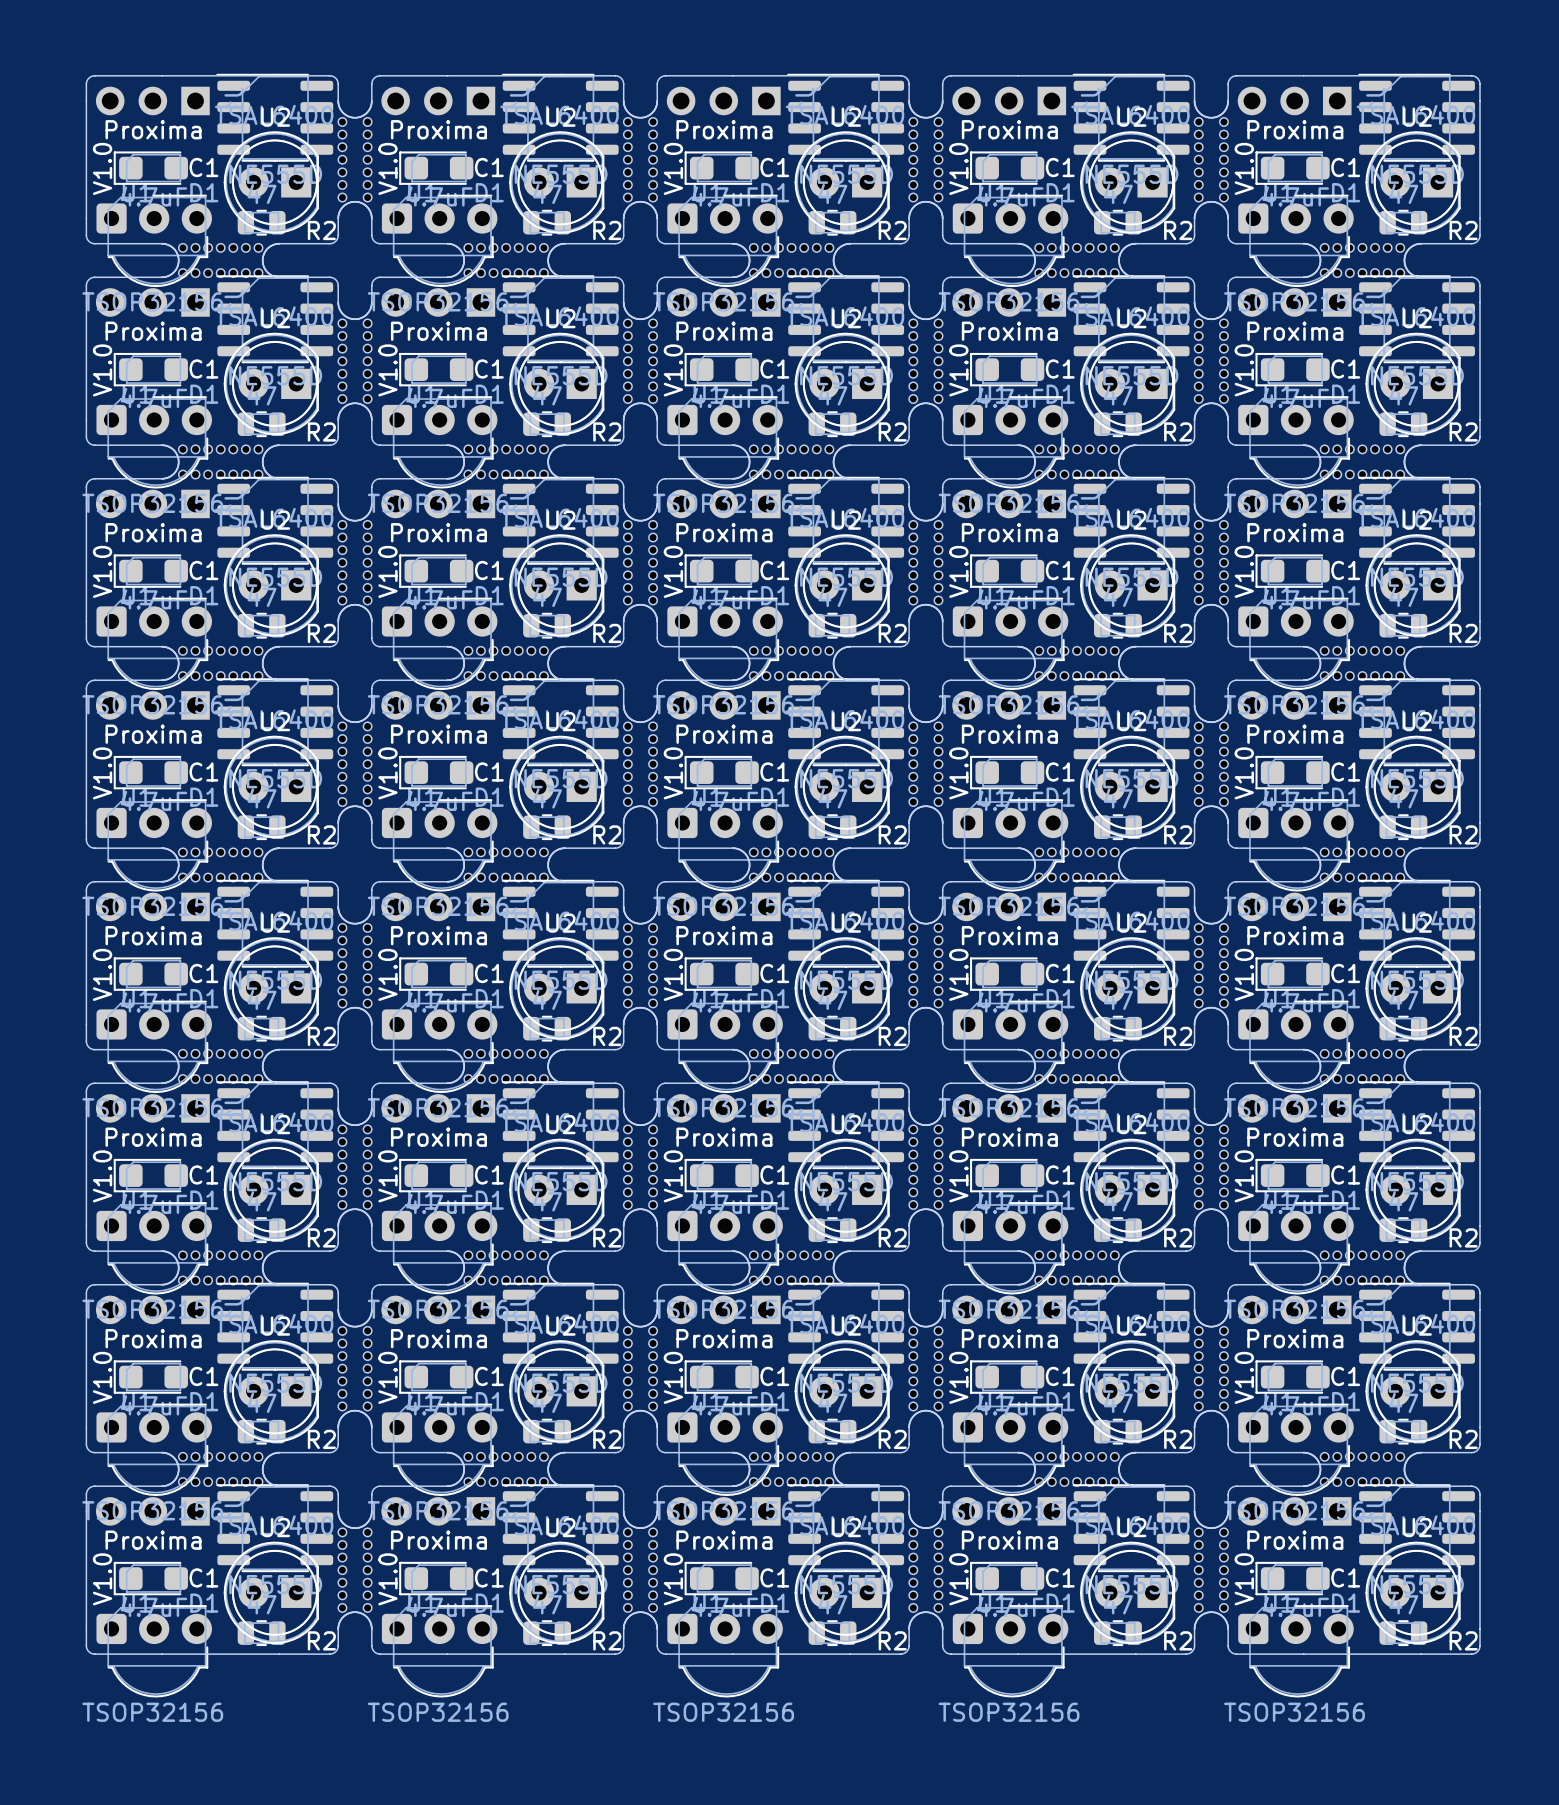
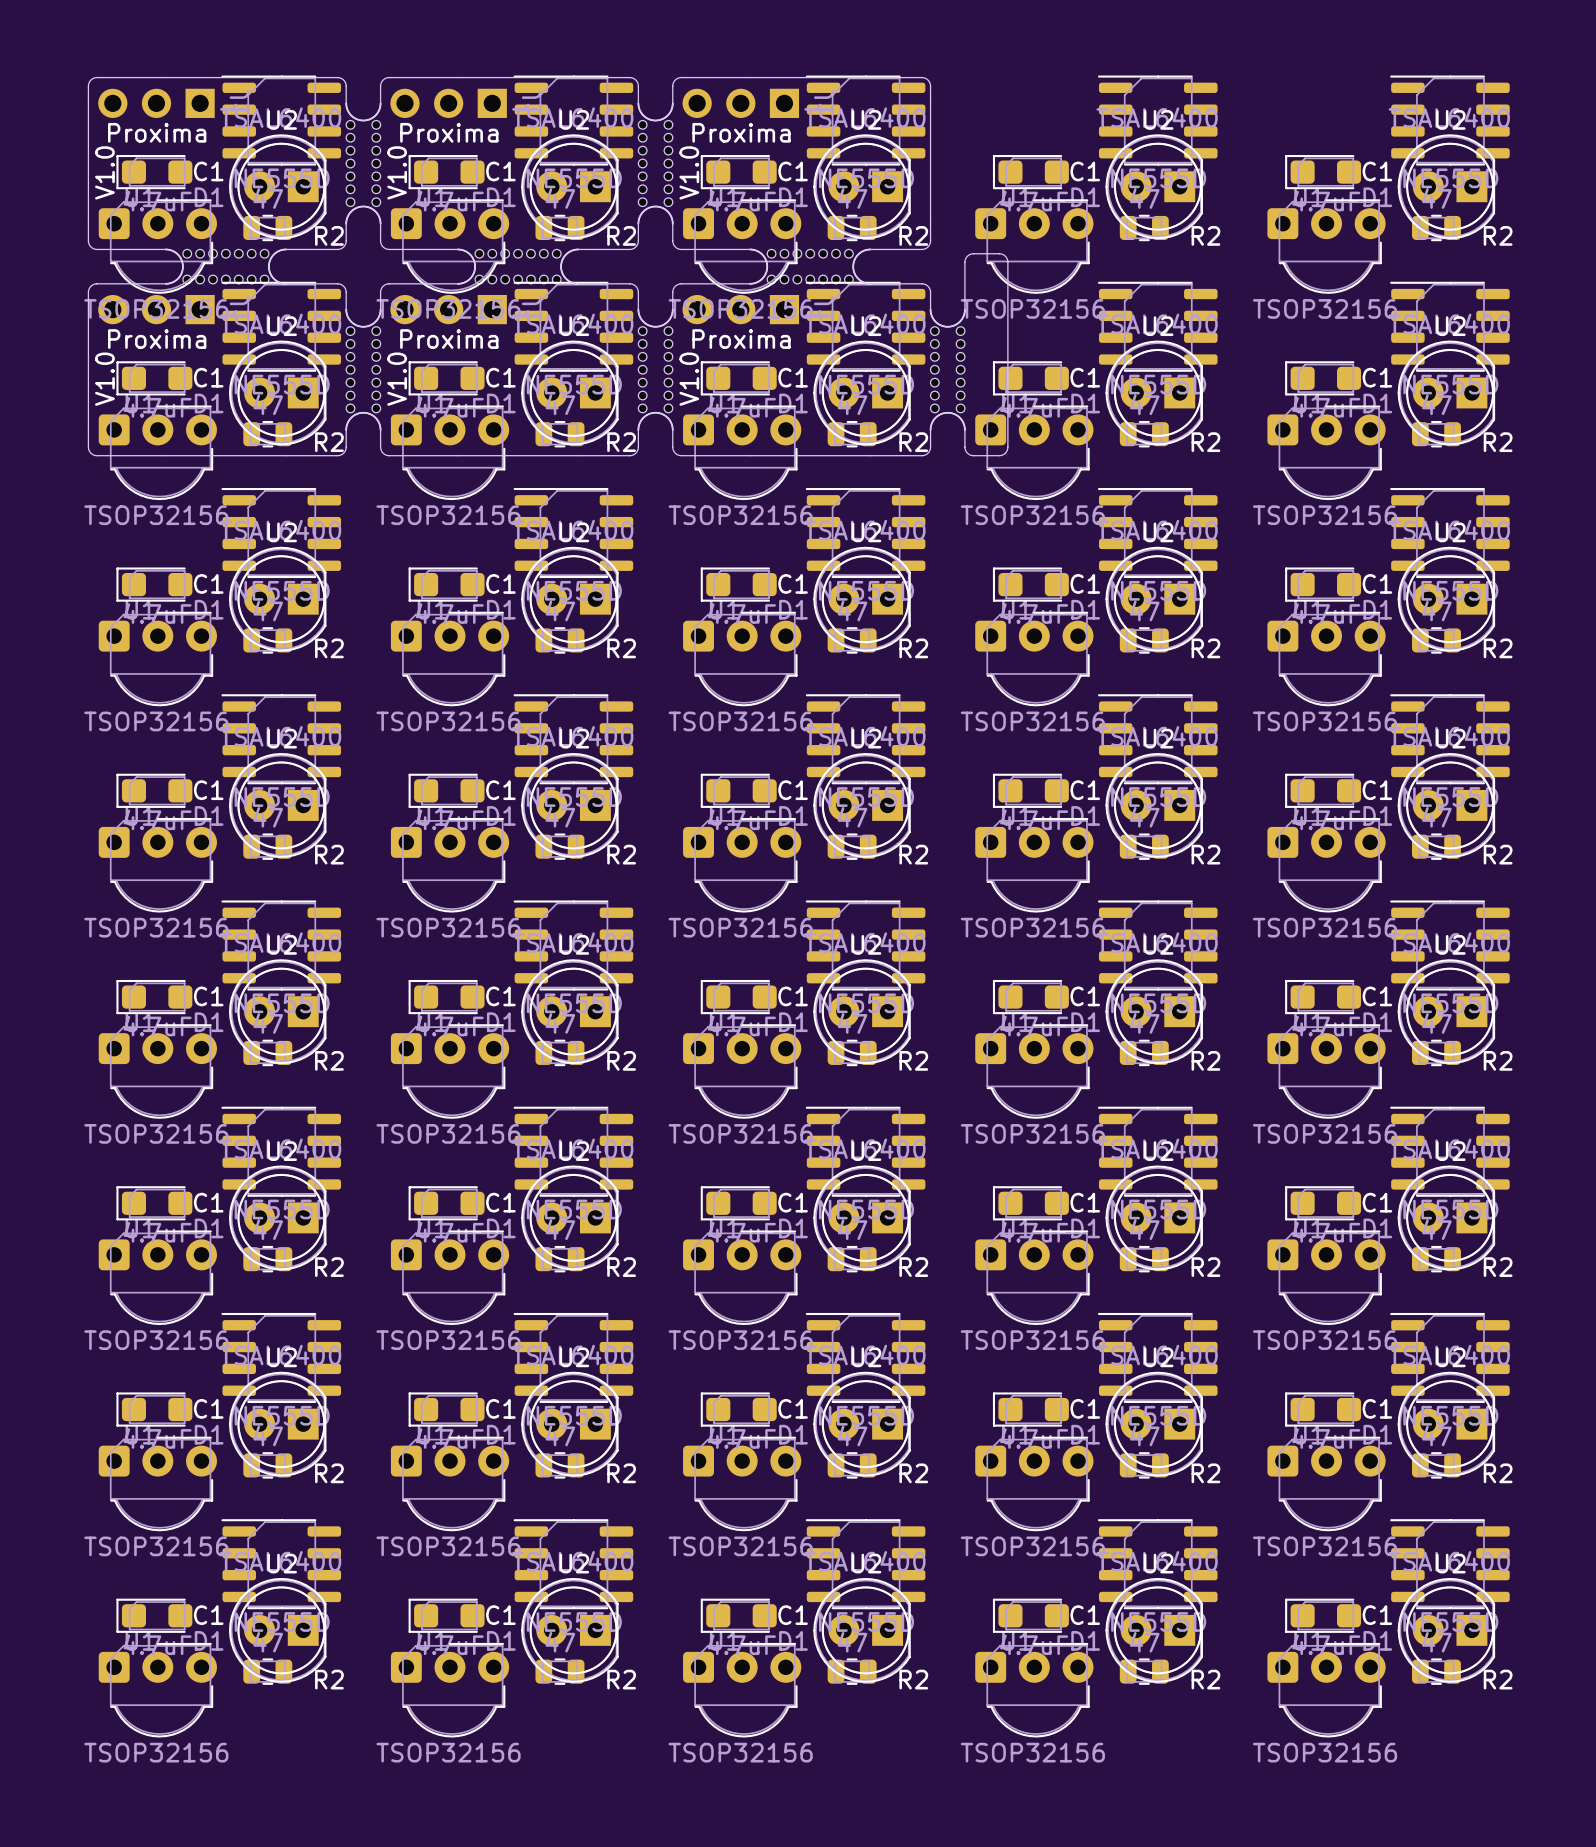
board edge: (909, 100) (911, 109) (917, 115) (925, 117) (934, 115) (942, 105) (943, 80) (950, 75) (1186, 75) (1191, 77) (1194, 82) (1194, 103) (1196, 109) (1202, 115) (1211, 117) (1219, 115) (1225, 109) (1227, 103) (1228, 82) (1235, 75) (1471, 75) (1479, 80) (1479, 238) (1472, 243) (1416, 244) (1407, 250) (1404, 260) (1407, 270) (1416, 276) (1472, 277) (1477, 279) (1480, 285) (1479, 440) (1472, 445) (1416, 445) (1407, 451) (1404, 461) (1407, 472) (1416, 478) (1472, 478) (1477, 481) (1480, 487) (1479, 641) (1472, 646) (1416, 647) (1407, 653) (1404, 663) (1407, 673) (1416, 679) (1472, 680) (1477, 682) (1479, 687) (1479, 842) (1472, 848) (1416, 848) (1407, 854) (1404, 864) (1407, 875) (1416, 881) (1472, 881) (1477, 884) (1479, 889) (1479, 1044) (1472, 1049) (1416, 1050) (1407, 1056) (1404, 1066) (1407, 1076) (1416, 1082) (1472, 1083) (1477, 1085) (1479, 1090) (1479, 1245) (1472, 1251) (1416, 1251) (1407, 1257) (1404, 1267) (1407, 1278) (1416, 1284) (1472, 1284) (1477, 1287) (1479, 1292) (1479, 1447) (1472, 1452) (1416, 1453) (1407, 1459) (1404, 1469) (1407, 1479) (1416, 1485) (1472, 1486) (1479, 1491) (1480, 1645) (1474, 1653) (1235, 1654) (1228, 1647) (1227, 1626) (1225, 1620) (1219, 1614) (1211, 1612) (1202, 1614) (1196, 1620) (1194, 1626) (1194, 1647) (1191, 1652) (1186, 1654) (950, 1654) (942, 1647) (942, 1626) (940, 1620) (934, 1614) (925, 1612) (917, 1614) (911, 1620) (909, 1626) (908, 1647) (905, 1652) (900, 1654) (664, 1654) (657, 1647) (657, 1626) (655, 1620) (648, 1614) (640, 1612) (632, 1614) (625, 1620) (623, 1626) (623, 1647) (616, 1654) (379, 1654) (372, 1647) (371, 1626) (369, 1620) (363, 1614) (355, 1612) (346, 1614) (340, 1620) (338, 1626) (337, 1647) (330, 1654) (94, 1654) (88, 1651) (86, 1645) (87, 1490) (94, 1486) (166, 1485) (175, 1479) (178, 1469) (175, 1459) (166, 1453) (93, 1452) (88, 1450) (86, 1444) (87, 1288) (94, 1284) (166, 1284) (175, 1278) (178, 1270) (175, 1257) (166, 1251) (93, 1251) (88, 1248) (86, 1242) (87, 1087) (94, 1083) (166, 1082) (175, 1076) (178, 1068) (175, 1056) (166, 1050) (93, 1049) (88, 1047) (86, 1041) (87, 885) (94, 881) (166, 881) (175, 875) (178, 864) (175, 854) (166, 848) (93, 848) (86, 841) (87, 684) (94, 680) (166, 679) (175, 673) (178, 663) (175, 653) (166, 647) (94, 646) (87, 642) (86, 486) (88, 481) (93, 478) (161, 478) (170, 476) (177, 468) (178, 457) (172, 448) (161, 445) -> none
part: (1009, 100) -> none
part: (1294, 100) -> none
text: Proxima (1009, 129) -> none
text: Proxima (1295, 129) -> none
part: (925, 159) -> none
part: (1211, 159) -> none
text: V1.0 (958, 168) -> none
text: V1.0 (1244, 168) -> none
board edge: (909, 218) (911, 210) (915, 205) (923, 201) (930, 202) (937, 206) (941, 212) (942, 236) (946, 242) (1020, 243) (1030, 248) (1034, 256) (1032, 268) (1022, 276) (950, 277) (945, 279) (942, 285) -> (930, 223) (930, 103)
board edge: (1194, 218) (1194, 237) (1189, 243) (1135, 243) (1125, 247) (1119, 258) (1122, 270) (1133, 277) (1190, 278) (1194, 284) (1194, 304) (1196, 310) (1202, 317) (1211, 319) (1219, 317) (1225, 310) (1227, 304) (1228, 283) (1233, 277) (1305, 277) (1313, 273) (1319, 266) (1320, 258) (1318, 252) (1308, 244) (1232, 242) (1228, 236) (1226, 212) (1217, 203) (1209, 201) (1201, 205) (1196, 210) (1194, 218) -> none
part: (1077, 260) -> none
part: (1362, 260) -> none
part: (1009, 302) -> none
part: (1294, 302) -> none
text: Proxima (1009, 331) -> none
text: Proxima (1295, 331) -> none
part: (1211, 361) -> none
text: V1.0 (958, 370) -> none
text: V1.0 (1244, 370) -> none
board edge: (1194, 420) (1194, 438) (1189, 444) (1135, 445) (1125, 448) (1119, 459) (1122, 472) (1133, 478) (1190, 479) (1194, 486) (1194, 506) (1196, 512) (1202, 518) (1211, 520) (1219, 518) (1225, 512) (1227, 506) (1228, 484) (1233, 479) (1305, 478) (1313, 475) (1319, 468) (1320, 459) (1318, 453) (1308, 445) (1232, 444) (1228, 437) (1226, 413) (1217, 404) (1209, 403) (1201, 406) (1196, 411) (1194, 420) -> none
board edge: (279, 445) (269, 448) (263, 455) (262, 464) (267, 473) (277, 478) (334, 479) (338, 486) (338, 506) (340, 512) (346, 518) (355, 520) (363, 518) (369, 512) (371, 506) (372, 484) (377, 479) (447, 478) (457, 475) (463, 466) (463, 457) (457, 448) (447, 445) -> (286, 455) (165, 455)
board edge: (564, 445) (554, 448) (549, 455) (548, 464) (553, 473) (562, 478) (619, 479) (623, 486) (623, 506) (625, 512) (632, 518) (640, 520) (648, 518) (655, 512) (657, 506) (657, 484) (662, 479) (732, 478) (743, 475) (749, 466) (749, 457) (743, 448) (732, 445) -> (578, 455) (457, 455)
board edge: none -> (750, 455) (870, 455)
board edge: (850, 445) (840, 448) (834, 455) (833, 464) (838, 473) (848, 478) (904, 479) (909, 486) (909, 506) (911, 512) (917, 518) (925, 520) (934, 518) (940, 512) (942, 506) (942, 484) (947, 479) (1020, 478) (1028, 475) (1033, 468) (1033, 455) (1024, 446) (976, 445) -> (964, 292) (964, 261) (968, 255) (999, 253) (1006, 257) (1007, 262) (1007, 447) (1005, 453) (999, 455)
part: (220, 461) -> none
part: (506, 461) -> none
part: (791, 461) -> none
part: (1077, 461) -> none
part: (1362, 461) -> none
part: (152, 503) -> none
part: (438, 503) -> none
part: (723, 503) -> none
part: (1009, 503) -> none
part: (1294, 503) -> none
text: Proxima (153, 532) -> none
text: Proxima (438, 532) -> none
text: Proxima (724, 532) -> none
text: Proxima (1009, 532) -> none
text: Proxima (1295, 532) -> none
part: (355, 562) -> none
part: (640, 562) -> none
part: (925, 562) -> none
part: (1211, 562) -> none
text: V1.0 (102, 571) -> none
text: V1.0 (387, 571) -> none
text: V1.0 (673, 571) -> none
text: V1.0 (958, 571) -> none
text: V1.0 (1244, 571) -> none
board edge: (338, 621) (337, 640) (333, 646) (279, 646) (269, 650) (262, 661) (266, 673) (277, 680) (334, 681) (338, 687) (338, 707) (340, 713) (346, 719) (355, 722) (363, 719) (369, 713) (371, 707) (372, 686) (377, 680) (449, 680) (457, 676) (462, 669) (464, 661) (461, 655) (451, 647) (376, 645) (371, 639) (370, 615) (361, 605) (352, 604) (344, 608) (340, 613) (338, 621) -> none
board edge: (623, 621) (623, 640) (618, 646) (564, 646) (554, 650) (548, 661) (551, 673) (562, 680) (619, 681) (623, 687) (623, 707) (625, 713) (632, 719) (640, 722) (648, 719) (655, 713) (657, 707) (657, 686) (662, 680) (735, 680) (743, 676) (748, 669) (749, 661) (747, 655) (737, 647) (661, 645) (657, 639) (655, 615) (646, 605) (638, 604) (630, 608) (625, 613) (623, 621) -> none
board edge: (909, 621) (908, 640) (903, 646) (850, 646) (840, 650) (833, 661) (837, 673) (848, 680) (904, 681) (909, 687) (909, 707) (911, 713) (917, 719) (925, 722) (934, 719) (940, 713) (942, 707) (942, 686) (947, 680) (1020, 680) (1028, 676) (1033, 669) (1034, 661) (1032, 655) (1022, 647) (946, 645) (942, 639) (941, 615) (932, 605) (923, 604) (915, 608) (911, 613) (909, 621) -> none
board edge: (1194, 621) (1194, 640) (1189, 646) (1135, 646) (1125, 650) (1119, 661) (1122, 673) (1133, 680) (1190, 681) (1194, 687) (1194, 707) (1196, 713) (1202, 719) (1211, 722) (1219, 719) (1225, 713) (1227, 707) (1228, 686) (1233, 680) (1305, 680) (1313, 676) (1319, 669) (1320, 661) (1318, 655) (1308, 647) (1232, 645) (1228, 639) (1226, 615) (1217, 605) (1209, 604) (1201, 608) (1196, 613) (1194, 621) -> none
part: (220, 663) -> none
part: (506, 663) -> none
part: (791, 663) -> none
part: (1077, 663) -> none
part: (1362, 663) -> none
part: (152, 705) -> none
part: (438, 705) -> none
part: (723, 705) -> none
part: (1009, 705) -> none
part: (1294, 705) -> none
text: Proxima (153, 734) -> none
text: Proxima (438, 734) -> none
text: Proxima (724, 734) -> none
text: Proxima (1009, 734) -> none
text: Proxima (1295, 734) -> none
part: (355, 764) -> none
part: (640, 764) -> none
part: (925, 764) -> none
part: (1211, 764) -> none
text: V1.0 (102, 773) -> none
text: V1.0 (387, 773) -> none
text: V1.0 (673, 773) -> none
text: V1.0 (958, 773) -> none
text: V1.0 (1244, 773) -> none
board edge: (338, 822) (337, 841) (333, 847) (279, 848) (269, 851) (262, 862) (266, 875) (277, 881) (334, 882) (338, 889) (338, 909) (340, 915) (346, 921) (355, 923) (363, 921) (369, 915) (371, 909) (372, 887) (377, 882) (449, 881) (457, 878) (462, 871) (464, 862) (461, 856) (451, 848) (376, 847) (371, 840) (370, 816) (361, 807) (352, 806) (344, 809) (340, 814) (338, 822) -> none
board edge: (623, 822) (623, 841) (618, 847) (564, 848) (554, 851) (548, 862) (551, 875) (562, 881) (619, 882) (623, 889) (623, 909) (625, 915) (632, 921) (640, 923) (648, 921) (655, 915) (657, 909) (657, 887) (662, 882) (735, 881) (743, 878) (748, 871) (749, 862) (747, 856) (737, 848) (661, 847) (657, 840) (655, 816) (646, 807) (638, 806) (630, 809) (625, 814) (623, 822) -> none
board edge: (909, 822) (908, 841) (903, 847) (850, 848) (840, 851) (833, 862) (837, 875) (848, 881) (904, 882) (909, 889) (909, 909) (911, 915) (917, 921) (925, 923) (934, 921) (940, 915) (942, 909) (942, 887) (947, 882) (1020, 881) (1028, 878) (1033, 871) (1034, 862) (1032, 856) (1022, 848) (946, 847) (942, 840) (941, 816) (932, 807) (923, 806) (915, 809) (911, 814) (909, 822) -> none
board edge: (1194, 822) (1194, 841) (1189, 847) (1135, 848) (1125, 851) (1119, 862) (1122, 875) (1133, 881) (1190, 882) (1194, 889) (1194, 909) (1196, 915) (1202, 921) (1211, 923) (1219, 921) (1225, 915) (1227, 909) (1228, 887) (1233, 882) (1305, 881) (1313, 878) (1319, 871) (1320, 862) (1318, 856) (1308, 848) (1232, 847) (1228, 840) (1226, 816) (1217, 807) (1209, 806) (1201, 809) (1196, 814) (1194, 822) -> none
part: (220, 864) -> none
part: (506, 864) -> none
part: (791, 864) -> none
part: (1077, 864) -> none
part: (1362, 864) -> none
part: (152, 906) -> none
part: (438, 906) -> none
part: (723, 906) -> none
part: (1009, 906) -> none
part: (1294, 906) -> none
text: Proxima (153, 935) -> none
text: Proxima (438, 935) -> none
text: Proxima (724, 935) -> none
text: Proxima (1009, 935) -> none
text: Proxima (1295, 935) -> none
part: (355, 965) -> none
part: (640, 965) -> none
part: (925, 965) -> none
part: (1211, 965) -> none
text: V1.0 (102, 974) -> none
text: V1.0 (387, 974) -> none
text: V1.0 (673, 974) -> none
text: V1.0 (958, 974) -> none
text: V1.0 (1244, 974) -> none
board edge: (338, 1024) (337, 1043) (333, 1049) (279, 1049) (269, 1053) (262, 1064) (266, 1076) (277, 1083) (334, 1084) (338, 1090) (338, 1110) (340, 1116) (346, 1122) (355, 1125) (363, 1122) (369, 1116) (371, 1110) (372, 1089) (377, 1083) (449, 1083) (457, 1079) (462, 1072) (464, 1064) (461, 1058) (451, 1050) (376, 1048) (371, 1042) (370, 1018) (361, 1008) (352, 1007) (344, 1011) (340, 1016) (338, 1024) -> none
board edge: (623, 1024) (623, 1043) (618, 1049) (564, 1049) (554, 1053) (548, 1064) (551, 1076) (562, 1083) (619, 1084) (623, 1090) (623, 1110) (625, 1116) (632, 1122) (640, 1125) (648, 1122) (655, 1116) (657, 1110) (657, 1089) (662, 1083) (735, 1083) (743, 1079) (748, 1072) (749, 1064) (747, 1058) (737, 1050) (661, 1048) (657, 1042) (655, 1018) (646, 1008) (638, 1007) (630, 1011) (625, 1016) (623, 1024) -> none
board edge: (909, 1024) (908, 1043) (903, 1049) (850, 1049) (840, 1053) (833, 1064) (837, 1076) (848, 1083) (904, 1084) (909, 1090) (909, 1110) (911, 1116) (917, 1122) (925, 1125) (934, 1122) (940, 1116) (942, 1110) (942, 1089) (947, 1083) (1020, 1083) (1028, 1079) (1033, 1072) (1034, 1064) (1032, 1058) (1022, 1050) (946, 1048) (942, 1042) (941, 1018) (932, 1008) (923, 1007) (915, 1011) (911, 1016) (909, 1024) -> none
board edge: (1194, 1024) (1194, 1043) (1189, 1049) (1135, 1049) (1125, 1053) (1119, 1064) (1122, 1076) (1133, 1083) (1190, 1084) (1194, 1090) (1194, 1110) (1196, 1116) (1202, 1122) (1211, 1125) (1219, 1122) (1225, 1116) (1227, 1110) (1228, 1089) (1233, 1083) (1305, 1083) (1313, 1079) (1319, 1072) (1320, 1064) (1318, 1058) (1308, 1050) (1232, 1048) (1228, 1042) (1226, 1018) (1217, 1008) (1209, 1007) (1201, 1011) (1196, 1016) (1194, 1024) -> none
part: (220, 1066) -> none
part: (506, 1066) -> none
part: (791, 1066) -> none
part: (1077, 1066) -> none
part: (1362, 1066) -> none
part: (152, 1108) -> none
part: (438, 1108) -> none
part: (723, 1108) -> none
part: (1009, 1108) -> none
part: (1294, 1108) -> none
text: Proxima (153, 1137) -> none
text: Proxima (438, 1137) -> none
text: Proxima (724, 1137) -> none
text: Proxima (1009, 1137) -> none
text: Proxima (1295, 1137) -> none
part: (355, 1167) -> none
part: (640, 1167) -> none
part: (925, 1167) -> none
part: (1211, 1167) -> none
text: V1.0 (102, 1176) -> none
text: V1.0 (387, 1176) -> none
text: V1.0 (673, 1176) -> none
text: V1.0 (958, 1176) -> none
text: V1.0 (1244, 1176) -> none
board edge: (338, 1225) (337, 1244) (333, 1250) (279, 1251) (269, 1254) (262, 1265) (266, 1278) (277, 1284) (334, 1285) (338, 1292) (338, 1312) (340, 1318) (346, 1324) (355, 1326) (363, 1324) (369, 1318) (371, 1312) (372, 1290) (377, 1285) (449, 1284) (457, 1281) (462, 1274) (464, 1265) (461, 1259) (451, 1251) (376, 1250) (371, 1243) (370, 1219) (361, 1210) (352, 1209) (344, 1212) (340, 1217) (338, 1225) -> none
board edge: (623, 1225) (623, 1244) (618, 1250) (564, 1251) (554, 1254) (548, 1265) (551, 1278) (562, 1284) (619, 1285) (623, 1292) (623, 1312) (625, 1318) (632, 1324) (640, 1326) (648, 1324) (655, 1318) (657, 1312) (657, 1290) (662, 1285) (735, 1284) (743, 1281) (748, 1274) (749, 1265) (747, 1259) (737, 1251) (661, 1250) (657, 1243) (655, 1219) (646, 1210) (638, 1209) (630, 1212) (625, 1217) (623, 1225) -> none
board edge: (909, 1225) (908, 1244) (903, 1250) (850, 1251) (840, 1254) (833, 1265) (837, 1278) (848, 1284) (904, 1285) (909, 1292) (909, 1312) (911, 1318) (917, 1324) (925, 1326) (934, 1324) (940, 1318) (942, 1312) (942, 1290) (947, 1285) (1020, 1284) (1028, 1281) (1033, 1274) (1034, 1265) (1032, 1259) (1022, 1251) (946, 1250) (942, 1243) (941, 1219) (932, 1210) (923, 1209) (915, 1212) (911, 1217) (909, 1225) -> none
board edge: (1194, 1225) (1194, 1244) (1189, 1250) (1135, 1251) (1125, 1254) (1119, 1265) (1122, 1278) (1133, 1284) (1190, 1285) (1194, 1292) (1194, 1312) (1196, 1318) (1202, 1324) (1211, 1326) (1219, 1324) (1225, 1318) (1227, 1312) (1228, 1290) (1233, 1285) (1305, 1284) (1313, 1281) (1319, 1274) (1320, 1265) (1318, 1259) (1308, 1251) (1232, 1250) (1228, 1243) (1226, 1219) (1217, 1210) (1209, 1209) (1201, 1212) (1196, 1217) (1194, 1225) -> none
part: (220, 1267) -> none
part: (506, 1267) -> none
part: (791, 1267) -> none
part: (1077, 1267) -> none
part: (1362, 1267) -> none
part: (152, 1309) -> none
part: (438, 1309) -> none
part: (723, 1309) -> none
part: (1009, 1309) -> none
part: (1294, 1309) -> none
text: Proxima (153, 1338) -> none
text: Proxima (438, 1338) -> none
text: Proxima (724, 1338) -> none
text: Proxima (1009, 1338) -> none
text: Proxima (1295, 1338) -> none
part: (355, 1368) -> none
part: (640, 1368) -> none
part: (925, 1368) -> none
part: (1211, 1368) -> none
text: V1.0 (102, 1377) -> none
text: V1.0 (387, 1377) -> none
text: V1.0 (673, 1377) -> none
text: V1.0 (958, 1377) -> none
text: V1.0 (1244, 1377) -> none
board edge: (338, 1427) (337, 1446) (333, 1451) (279, 1452) (269, 1456) (262, 1467) (266, 1479) (277, 1486) (334, 1487) (338, 1493) (338, 1513) (340, 1519) (346, 1525) (355, 1528) (363, 1525) (369, 1519) (371, 1513) (372, 1492) (377, 1486) (449, 1486) (457, 1482) (462, 1475) (464, 1467) (461, 1461) (451, 1453) (376, 1451) (371, 1445) (370, 1421) (361, 1411) (352, 1410) (344, 1414) (340, 1419) (338, 1427) -> none
board edge: (623, 1427) (623, 1446) (618, 1451) (564, 1452) (554, 1456) (548, 1467) (551, 1479) (562, 1486) (619, 1487) (623, 1493) (623, 1513) (625, 1519) (632, 1525) (640, 1528) (648, 1525) (655, 1519) (657, 1513) (657, 1492) (662, 1486) (735, 1486) (743, 1482) (748, 1475) (749, 1467) (747, 1461) (737, 1453) (661, 1451) (657, 1445) (655, 1421) (646, 1411) (638, 1410) (630, 1414) (625, 1419) (623, 1427) -> none
board edge: (909, 1427) (908, 1446) (903, 1451) (850, 1452) (840, 1456) (833, 1467) (837, 1479) (848, 1486) (904, 1487) (909, 1493) (909, 1513) (911, 1519) (917, 1525) (925, 1528) (934, 1525) (940, 1519) (942, 1513) (942, 1492) (947, 1486) (1020, 1486) (1028, 1482) (1033, 1475) (1034, 1467) (1032, 1461) (1022, 1453) (946, 1451) (942, 1445) (941, 1421) (932, 1411) (923, 1410) (915, 1414) (911, 1419) (909, 1427) -> none
board edge: (1194, 1427) (1194, 1446) (1189, 1451) (1135, 1452) (1125, 1456) (1119, 1467) (1122, 1479) (1133, 1486) (1190, 1487) (1194, 1493) (1194, 1513) (1196, 1519) (1202, 1525) (1211, 1528) (1219, 1525) (1225, 1519) (1227, 1513) (1228, 1492) (1233, 1486) (1305, 1486) (1313, 1482) (1319, 1475) (1320, 1467) (1318, 1461) (1308, 1453) (1232, 1451) (1228, 1445) (1226, 1421) (1217, 1411) (1209, 1410) (1201, 1414) (1196, 1419) (1194, 1427) -> none
part: (220, 1469) -> none
part: (506, 1469) -> none
part: (791, 1469) -> none
part: (1077, 1469) -> none
part: (1362, 1469) -> none
part: (152, 1511) -> none
part: (438, 1511) -> none
part: (723, 1511) -> none
part: (1009, 1511) -> none
part: (1294, 1511) -> none
text: Proxima (153, 1540) -> none
text: Proxima (438, 1540) -> none
text: Proxima (724, 1540) -> none
text: Proxima (1009, 1540) -> none
text: Proxima (1295, 1540) -> none
part: (355, 1570) -> none
part: (640, 1570) -> none
part: (925, 1570) -> none
part: (1211, 1570) -> none
text: V1.0 (102, 1579) -> none
text: V1.0 (387, 1579) -> none
text: V1.0 (673, 1579) -> none
text: V1.0 (958, 1579) -> none
text: V1.0 (1244, 1579) -> none

